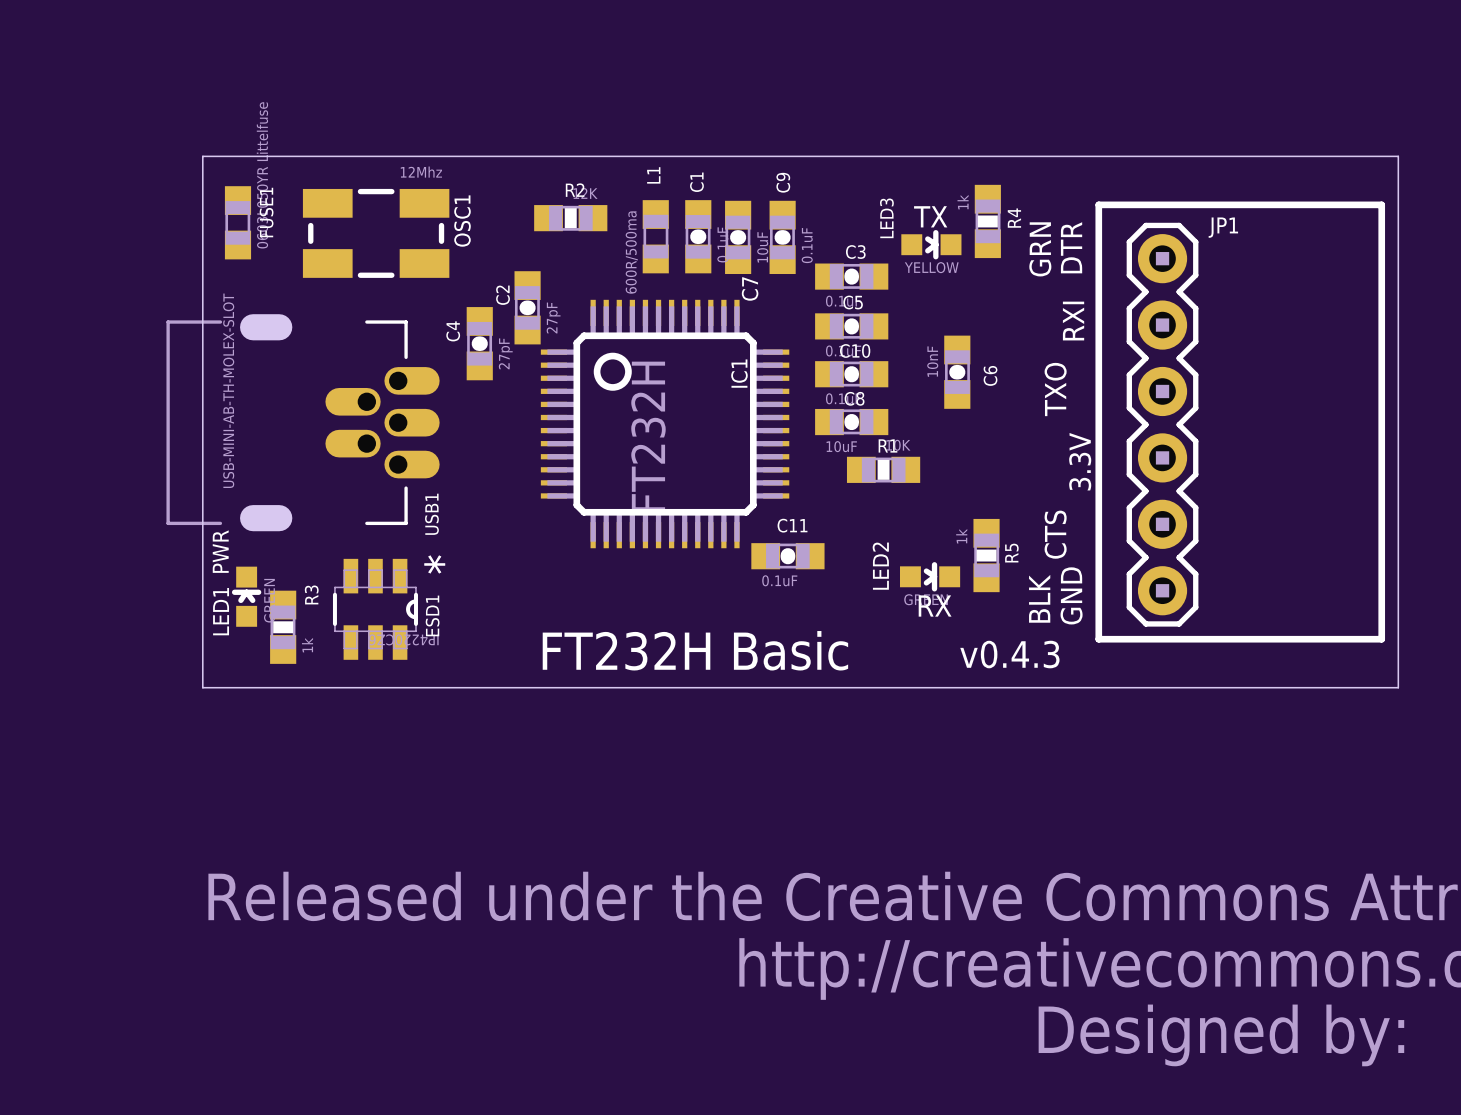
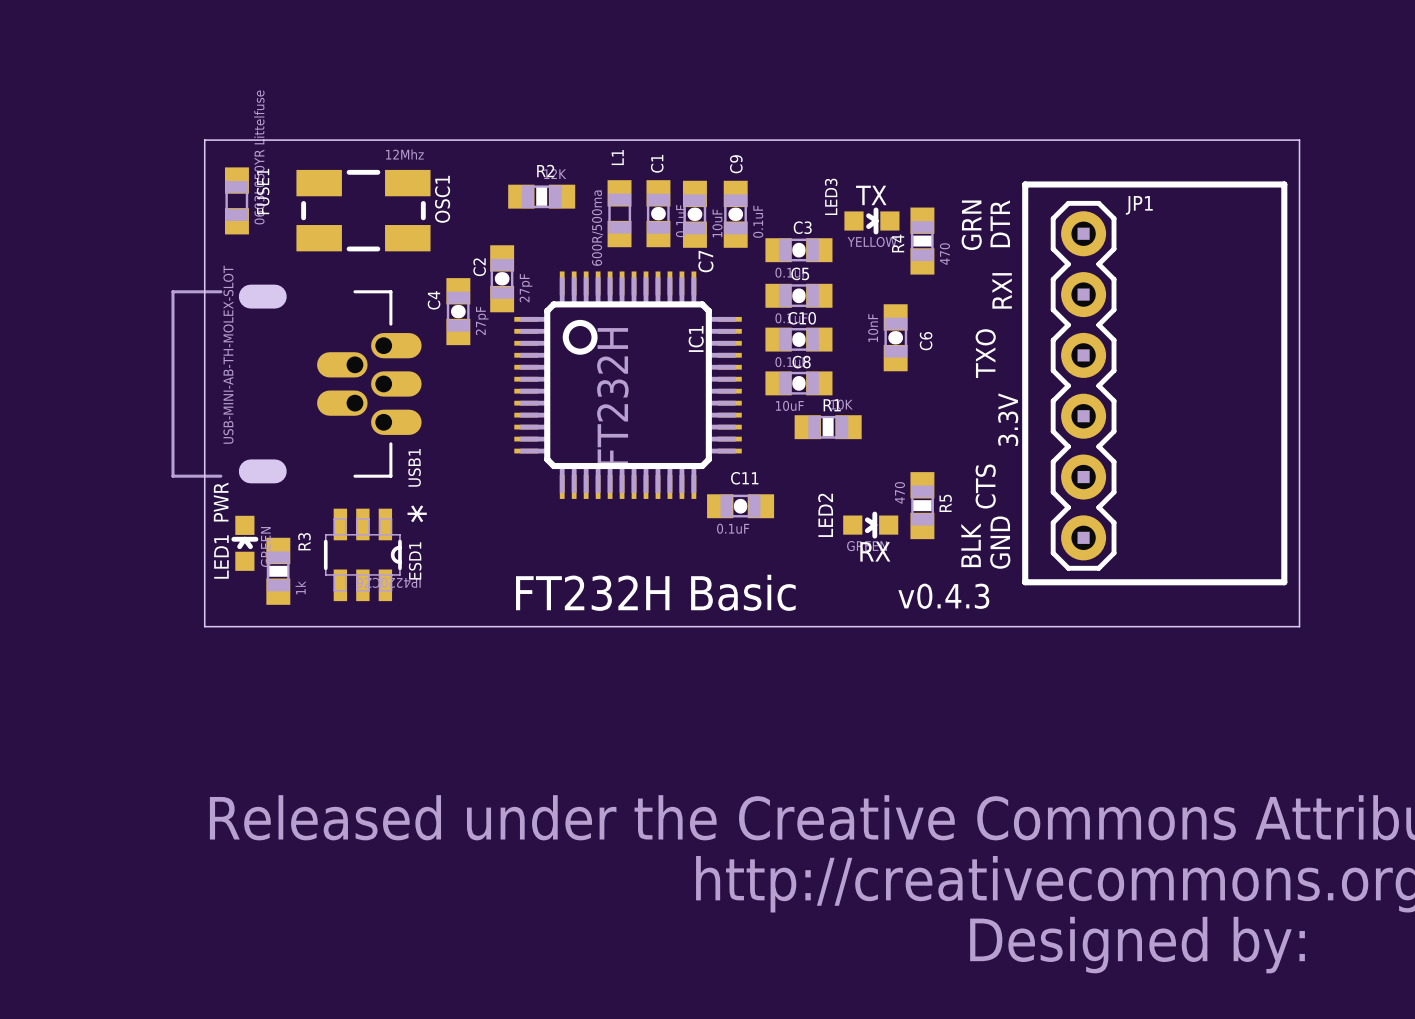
R4 value: 1k (963, 202) -> 470 (944, 254)
R4 name position: R4 (1014, 218) -> R4 (898, 243)
R4 position: (987, 221) -> (922, 241)
R5 value: 1k (961, 536) -> 470 (899, 492)

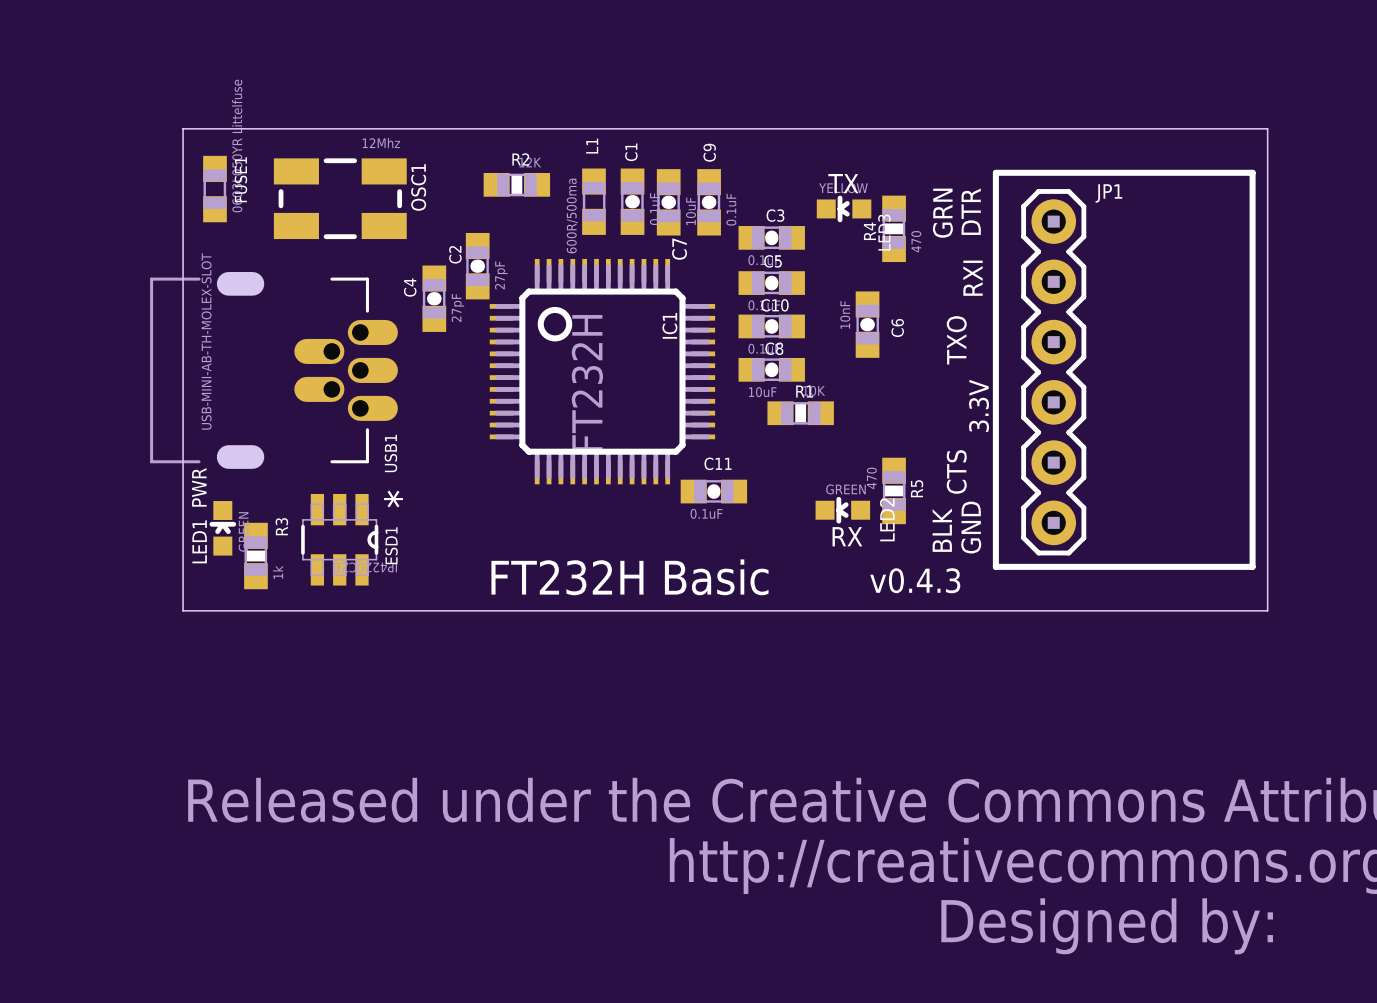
LED3 rotation: 0° (871, 220) -> 180° (844, 208)
LED2 rotation: 0° (870, 525) -> 180° (842, 510)

